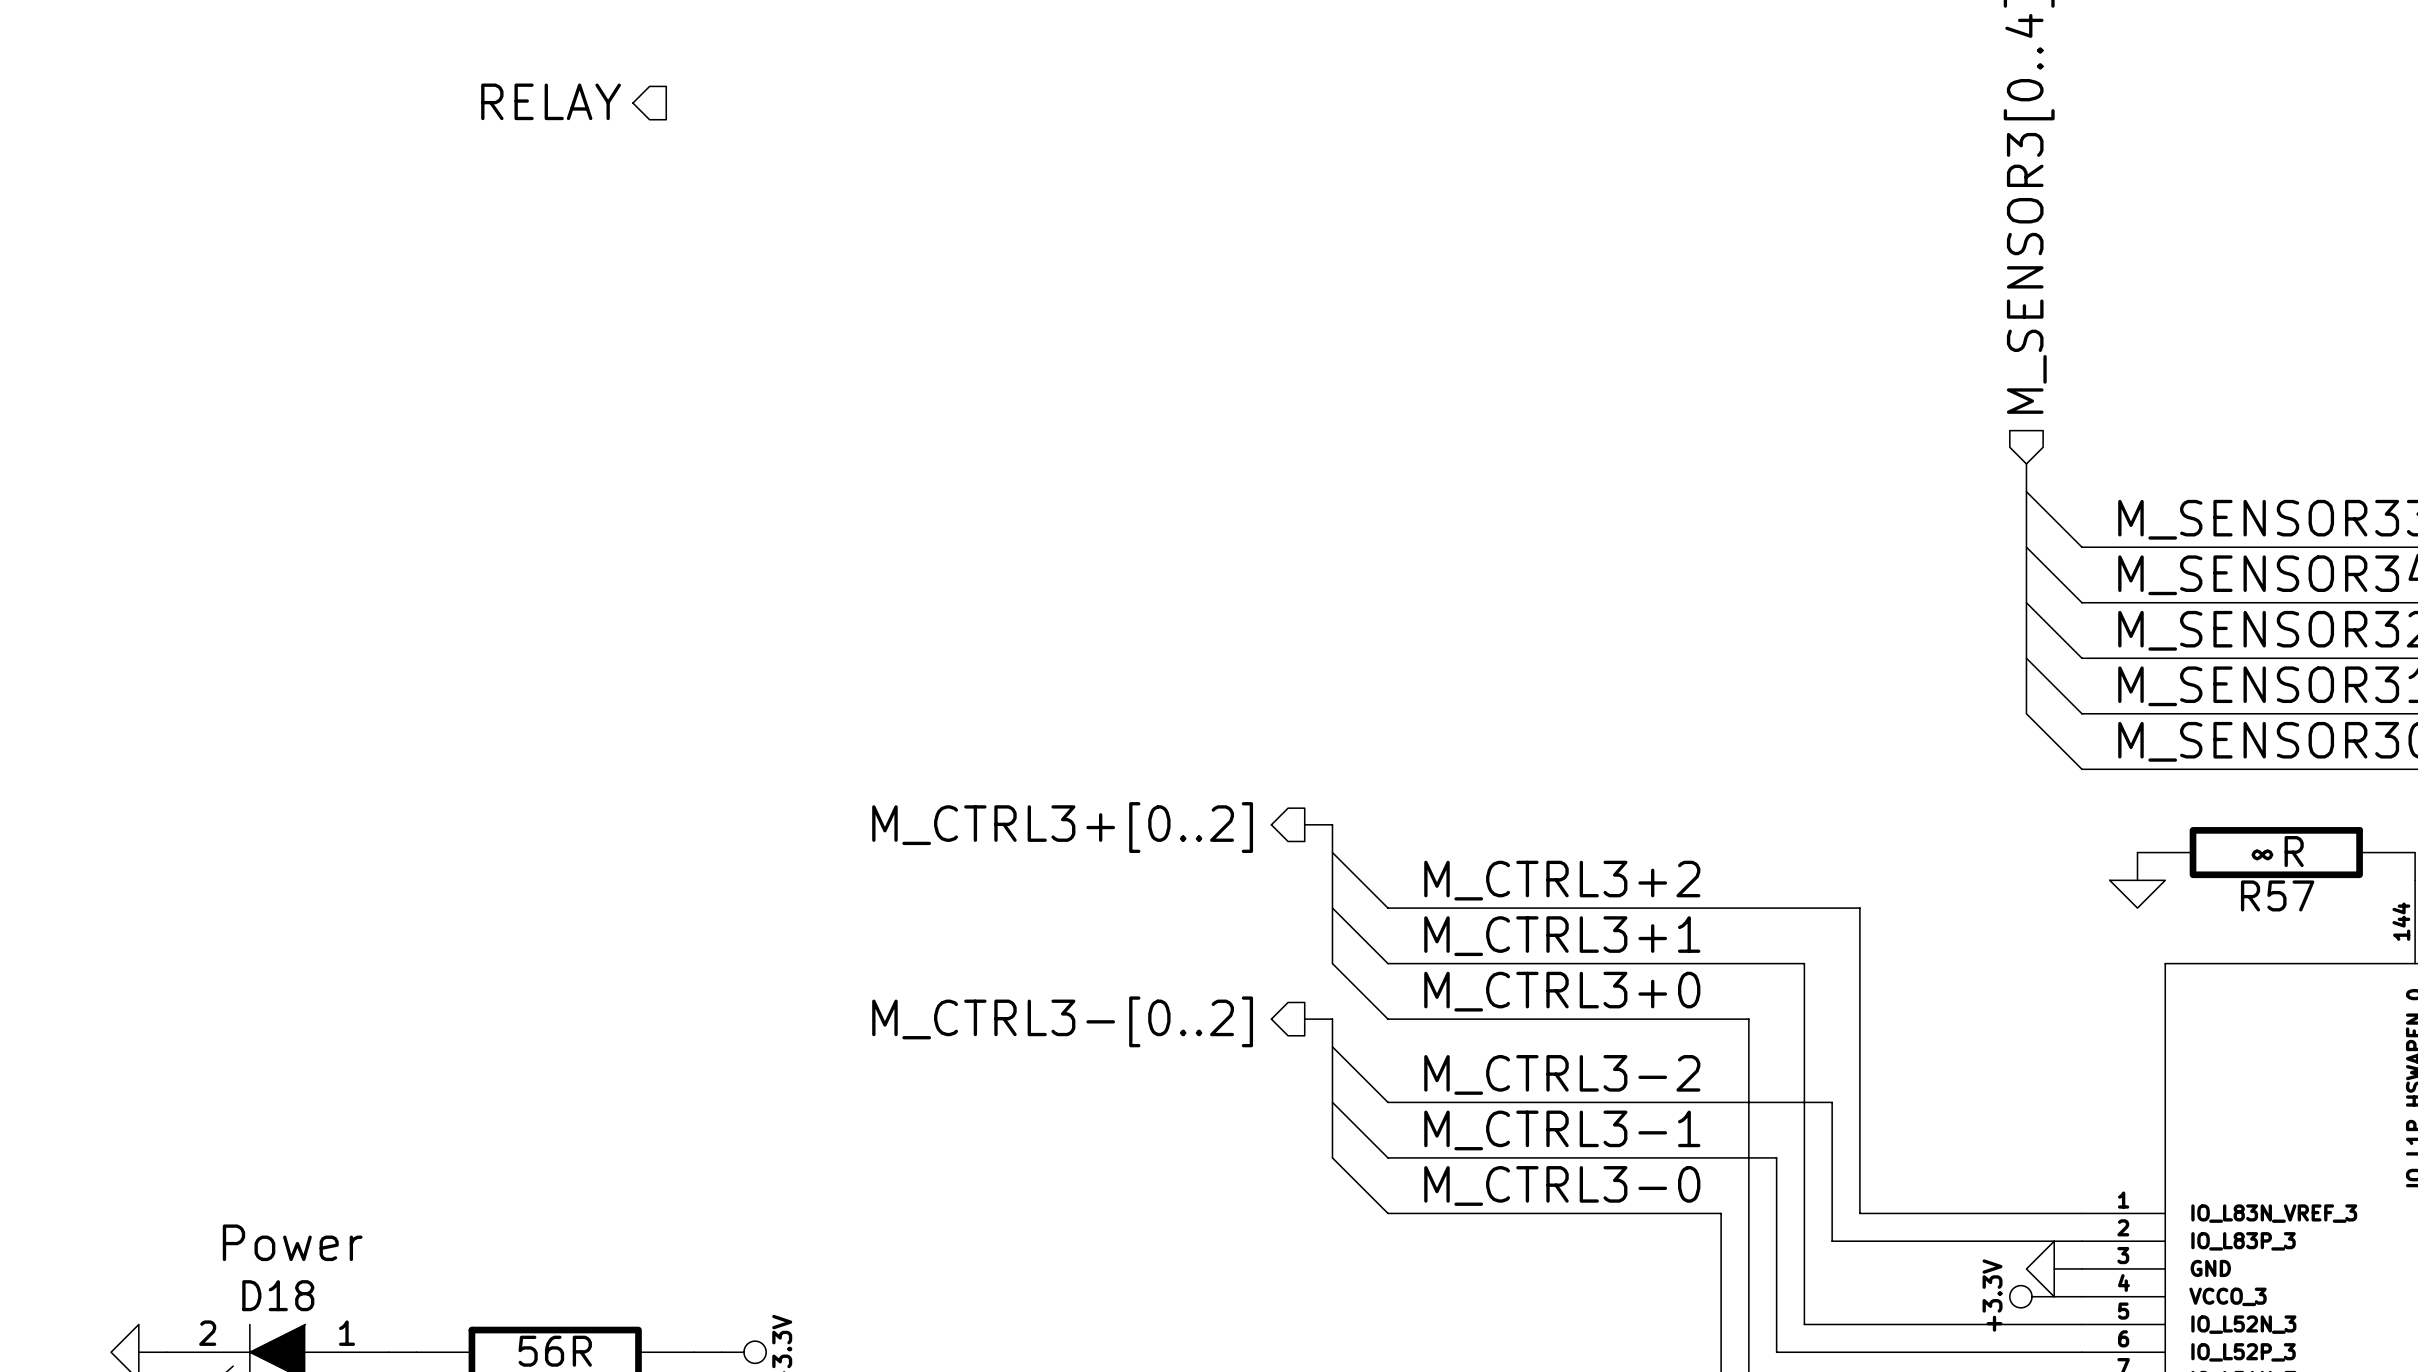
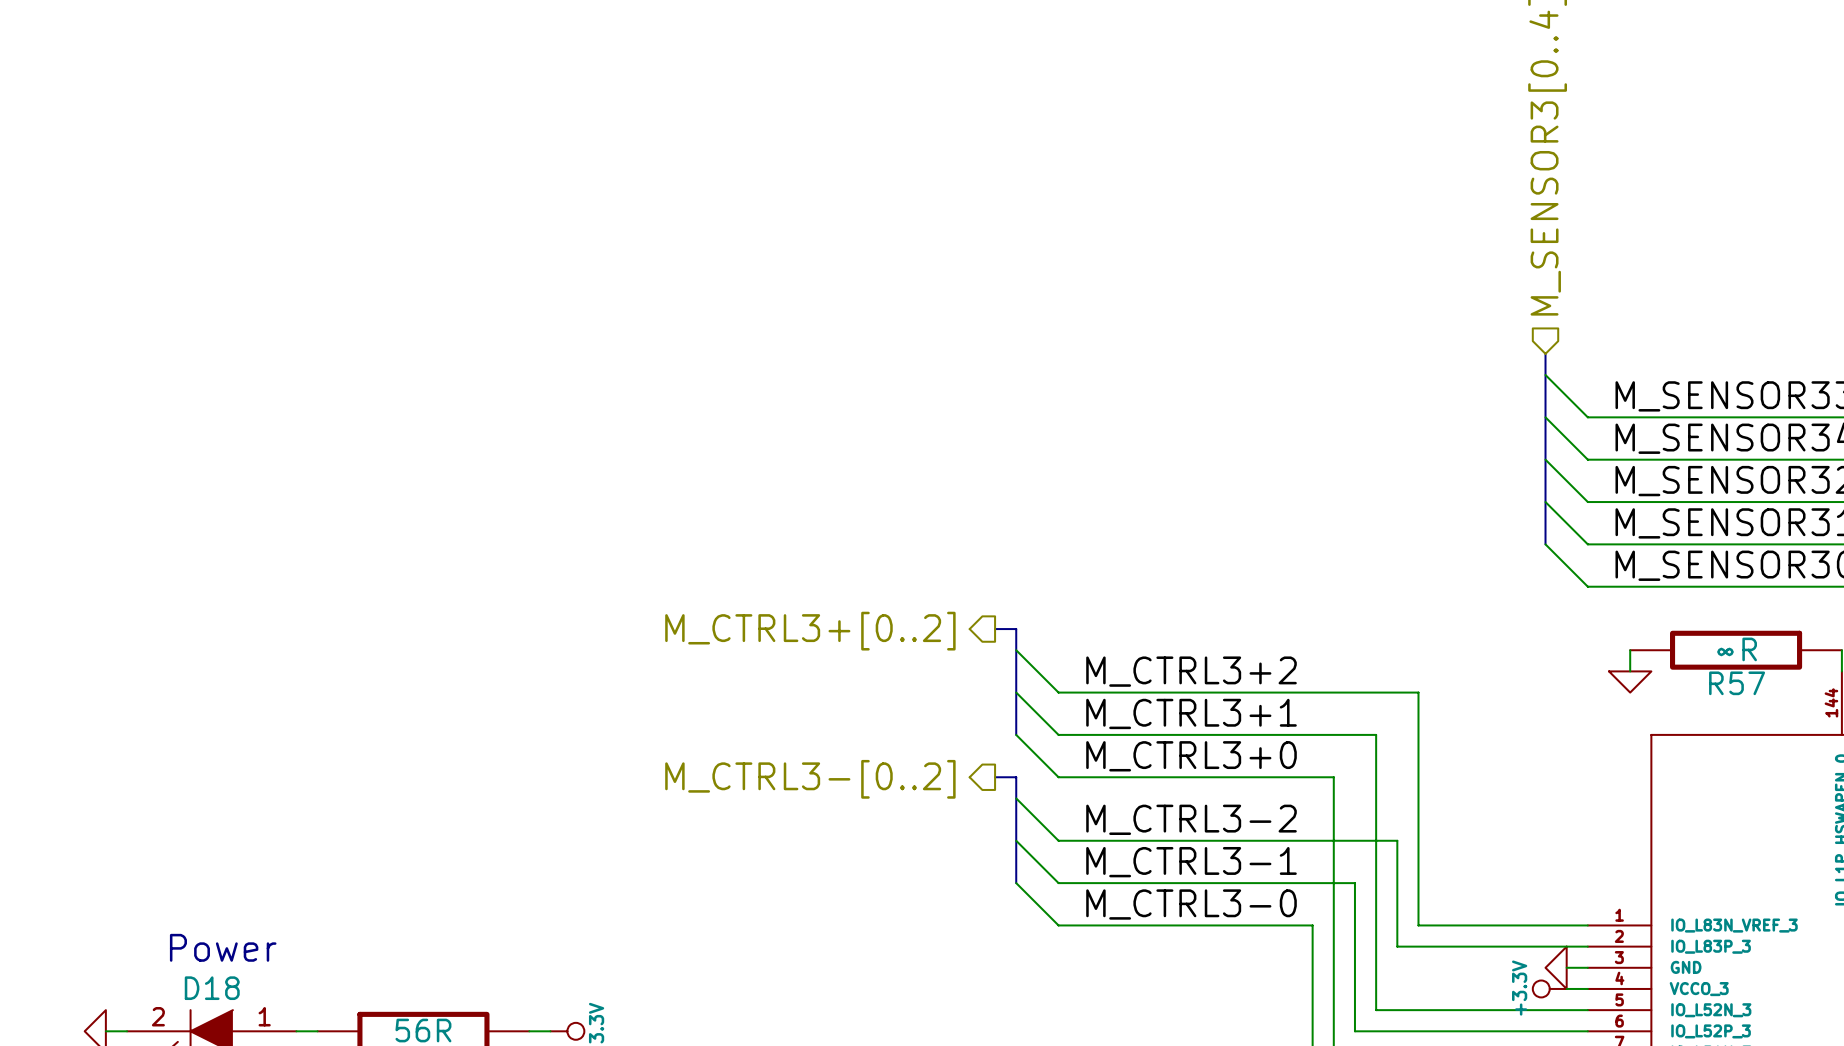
hierarchical label: RELAY (551, 101) -> none

